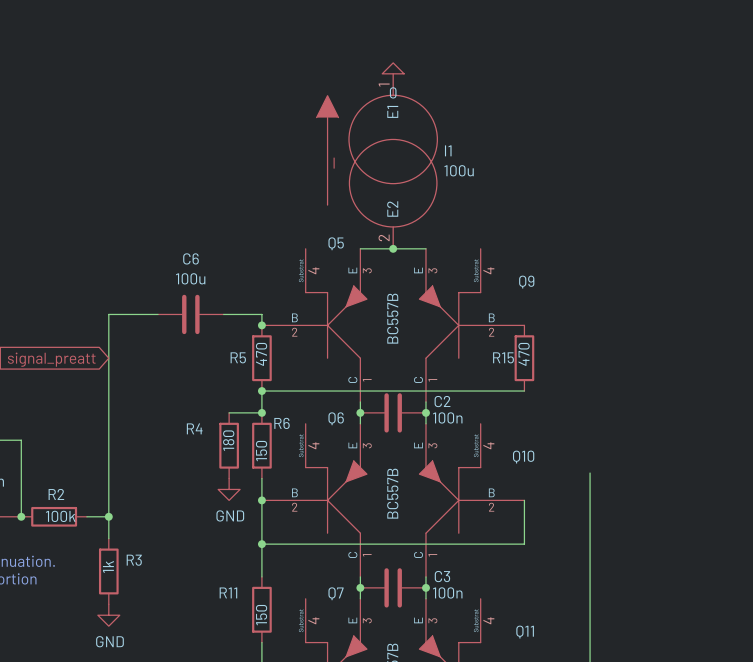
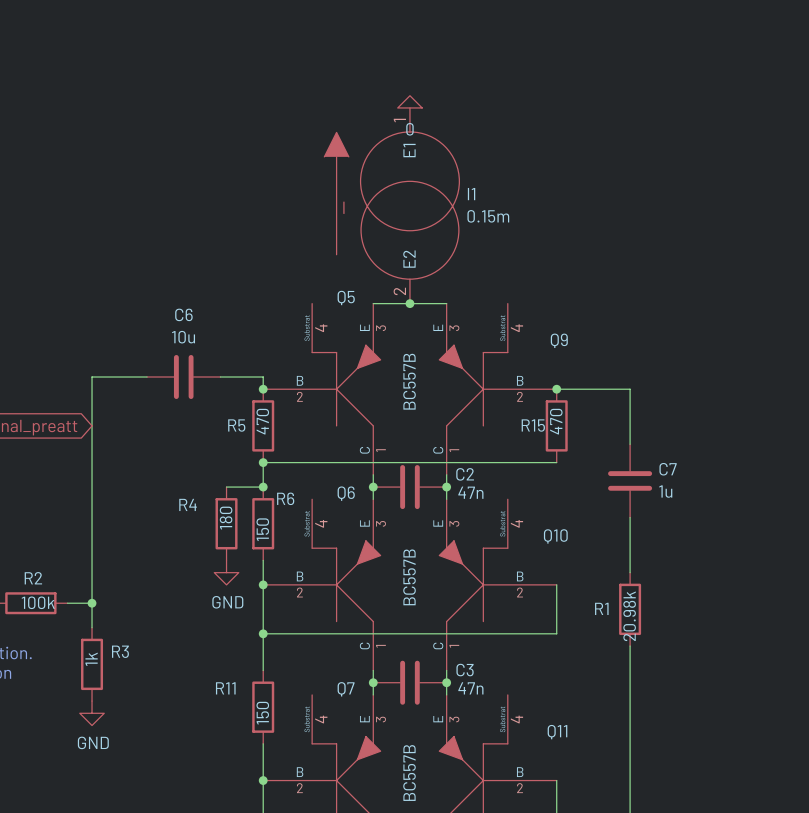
I1 value: 100u (459, 170) -> 0.15m (488, 216)
C6 value: 100u (190, 278) -> 10u (183, 337)
wire: none -> (556, 389) (630, 389) (630, 444)
junction: none -> (556, 389)
C7: none -> 1u (630, 480)
C2 value: 100n (447, 417) -> 47n (470, 492)
wire: none -> (630, 517) (630, 554)
R1: none -> 20.98k (630, 609)
C3 value: 100n (447, 592) -> 47n (470, 688)

